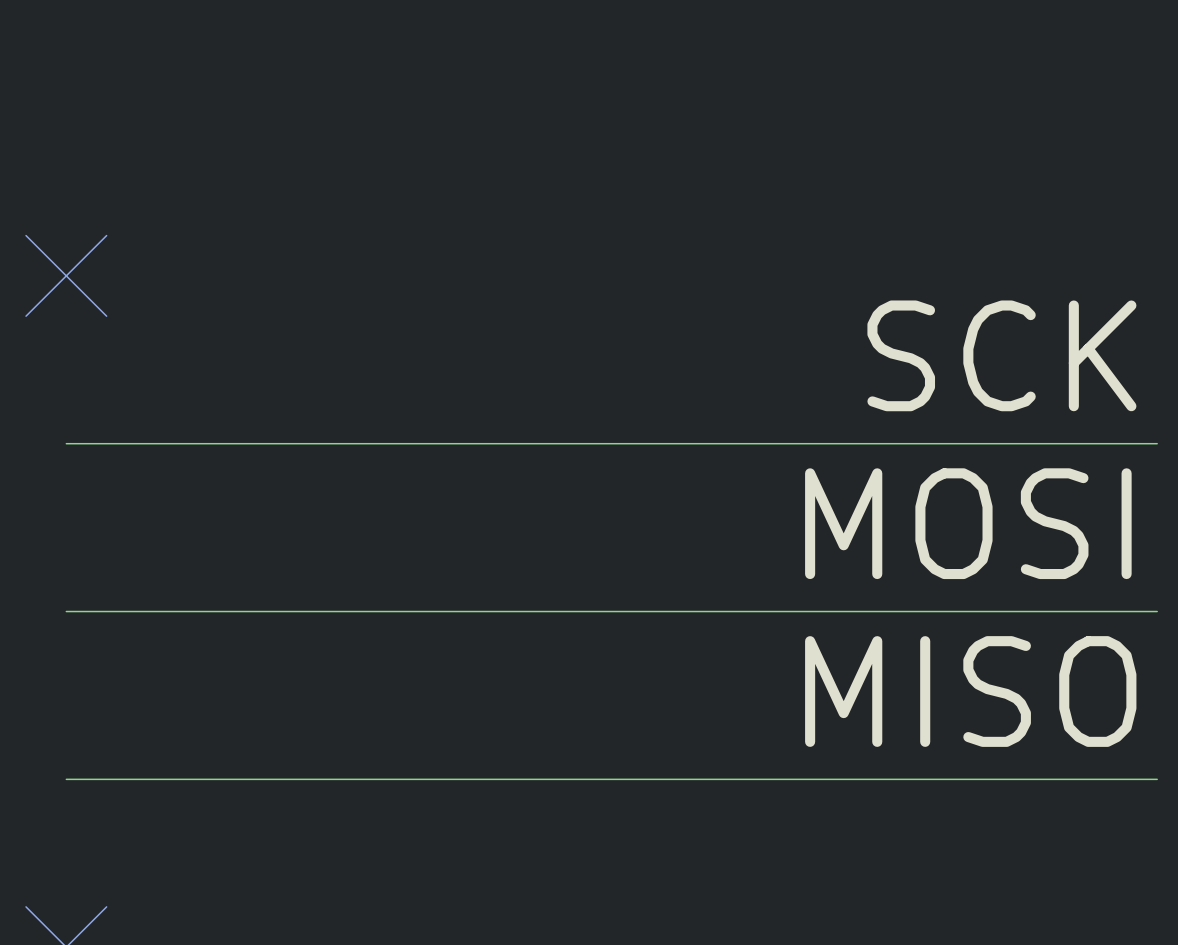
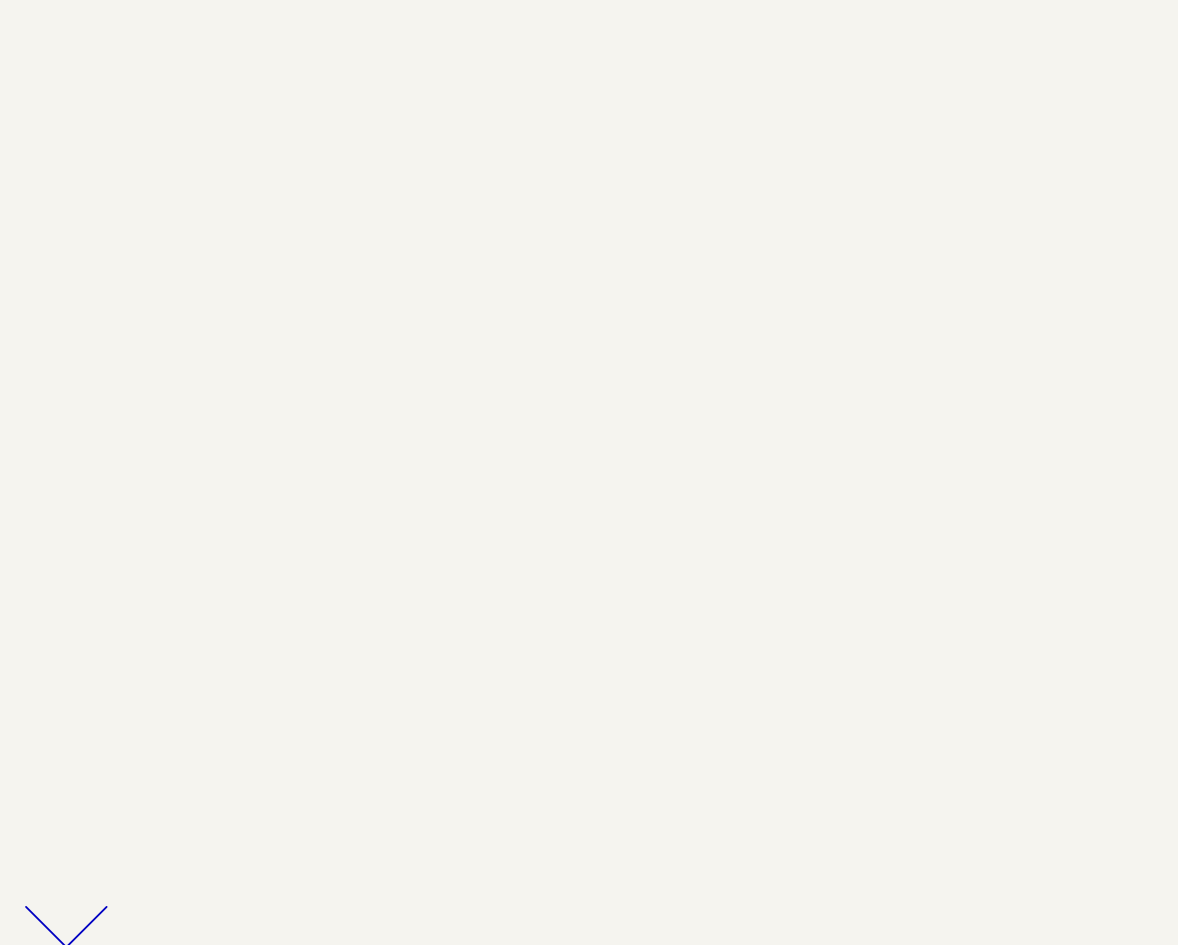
no-connect mark: (66, 275) -> none
label: SCK (1001, 355) -> none
wire: (66, 443) (1157, 443) -> none
label: MOSI (968, 523) -> none
wire: (66, 611) (1157, 611) -> none
label: MISO (970, 691) -> none
wire: (66, 779) (1157, 779) -> none

